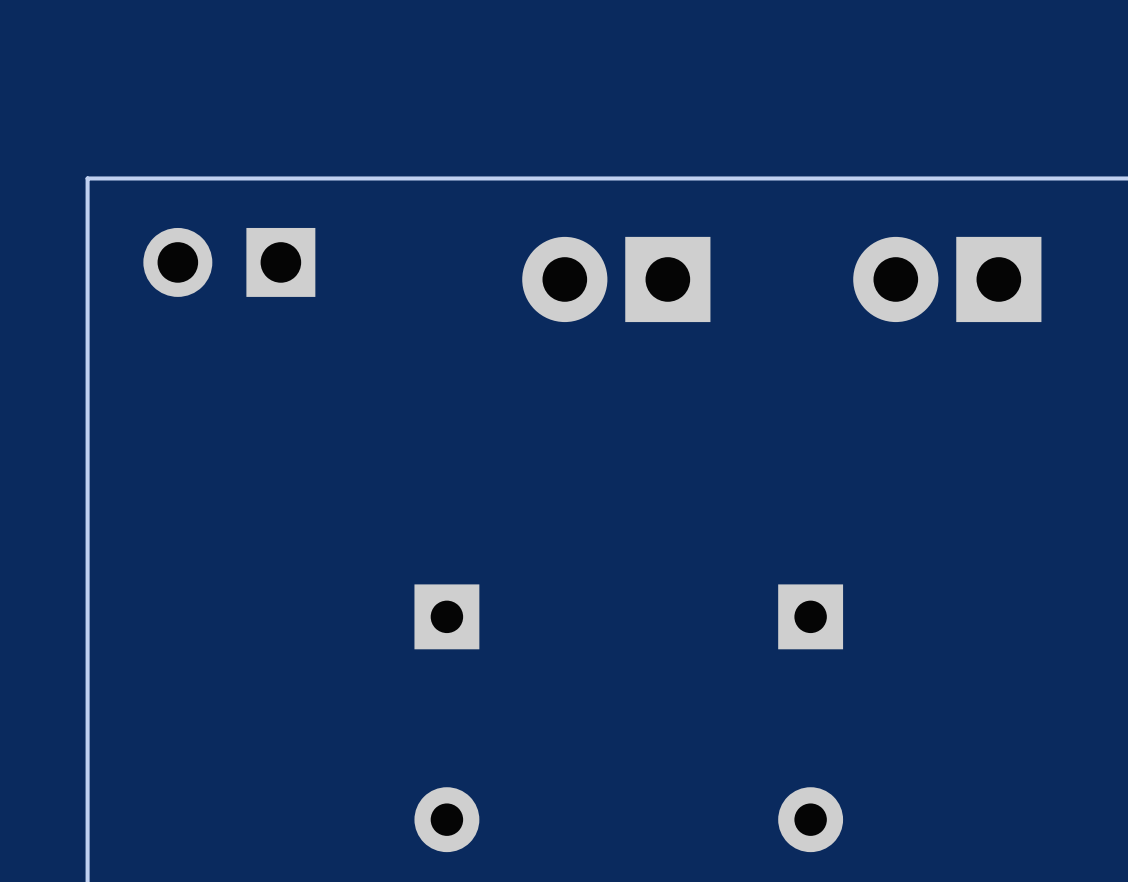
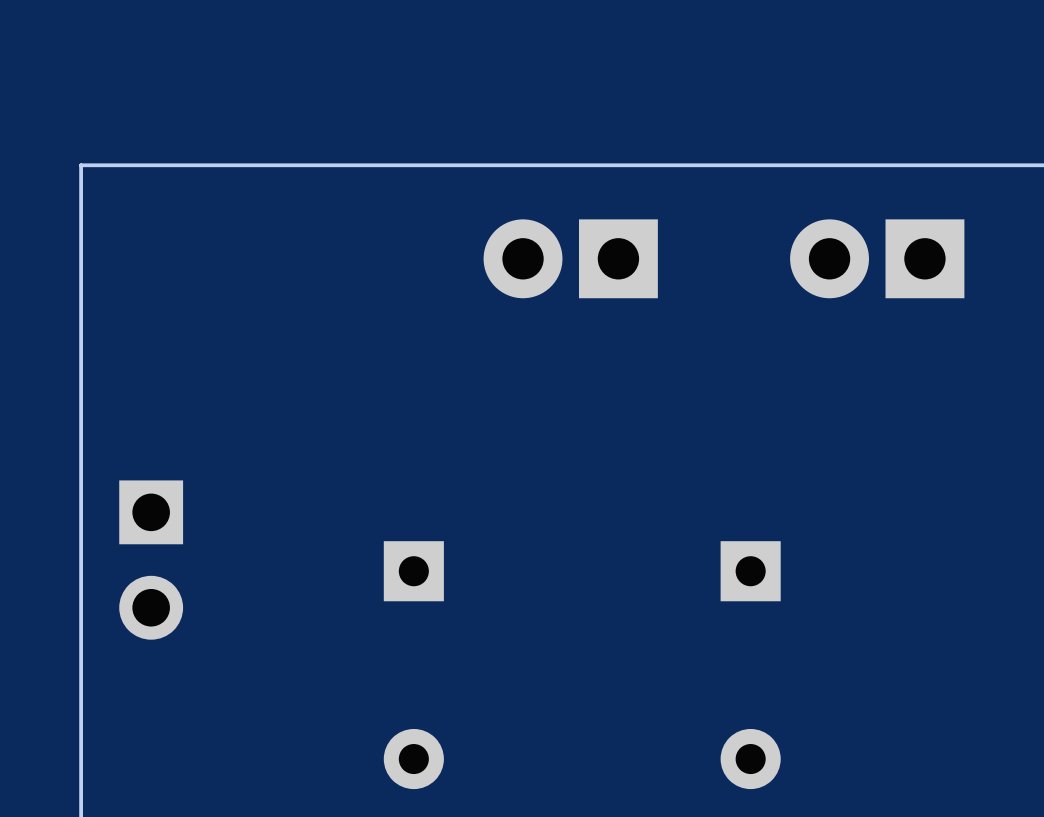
part rotation: 0° (229, 262) -> 90° counterclockwise (151, 560)
part position: (229, 262) -> (151, 560)

